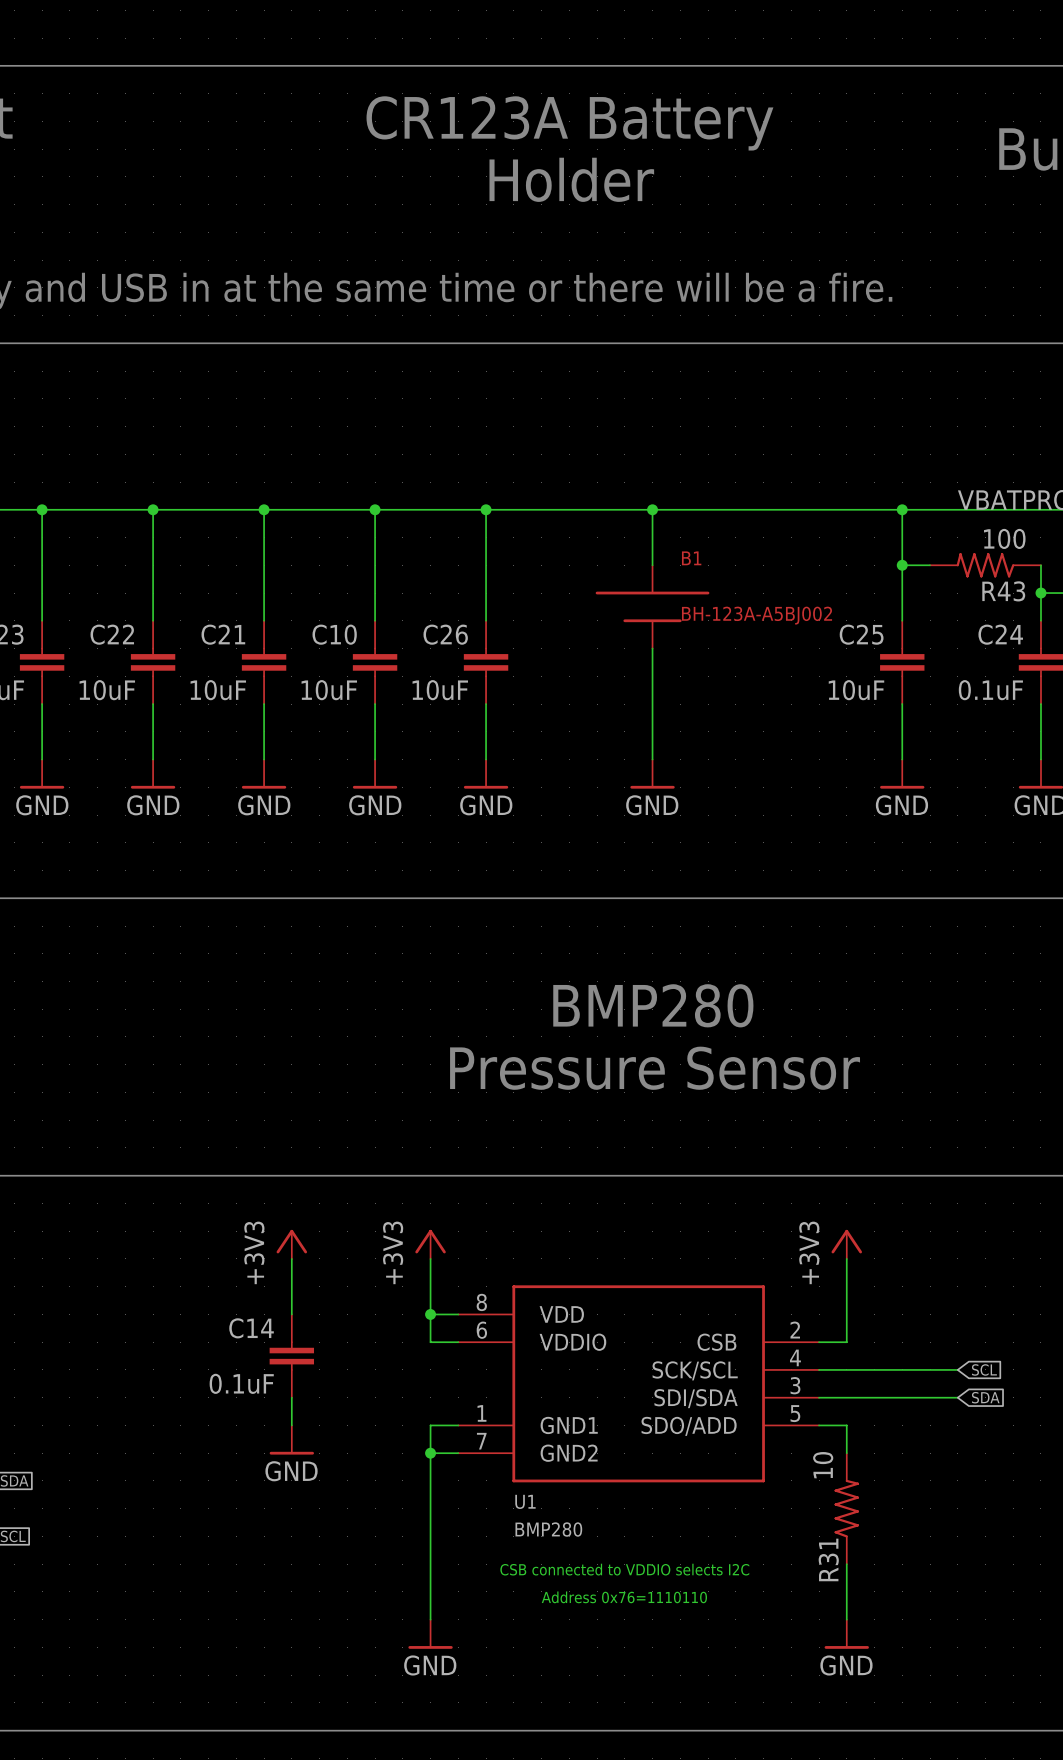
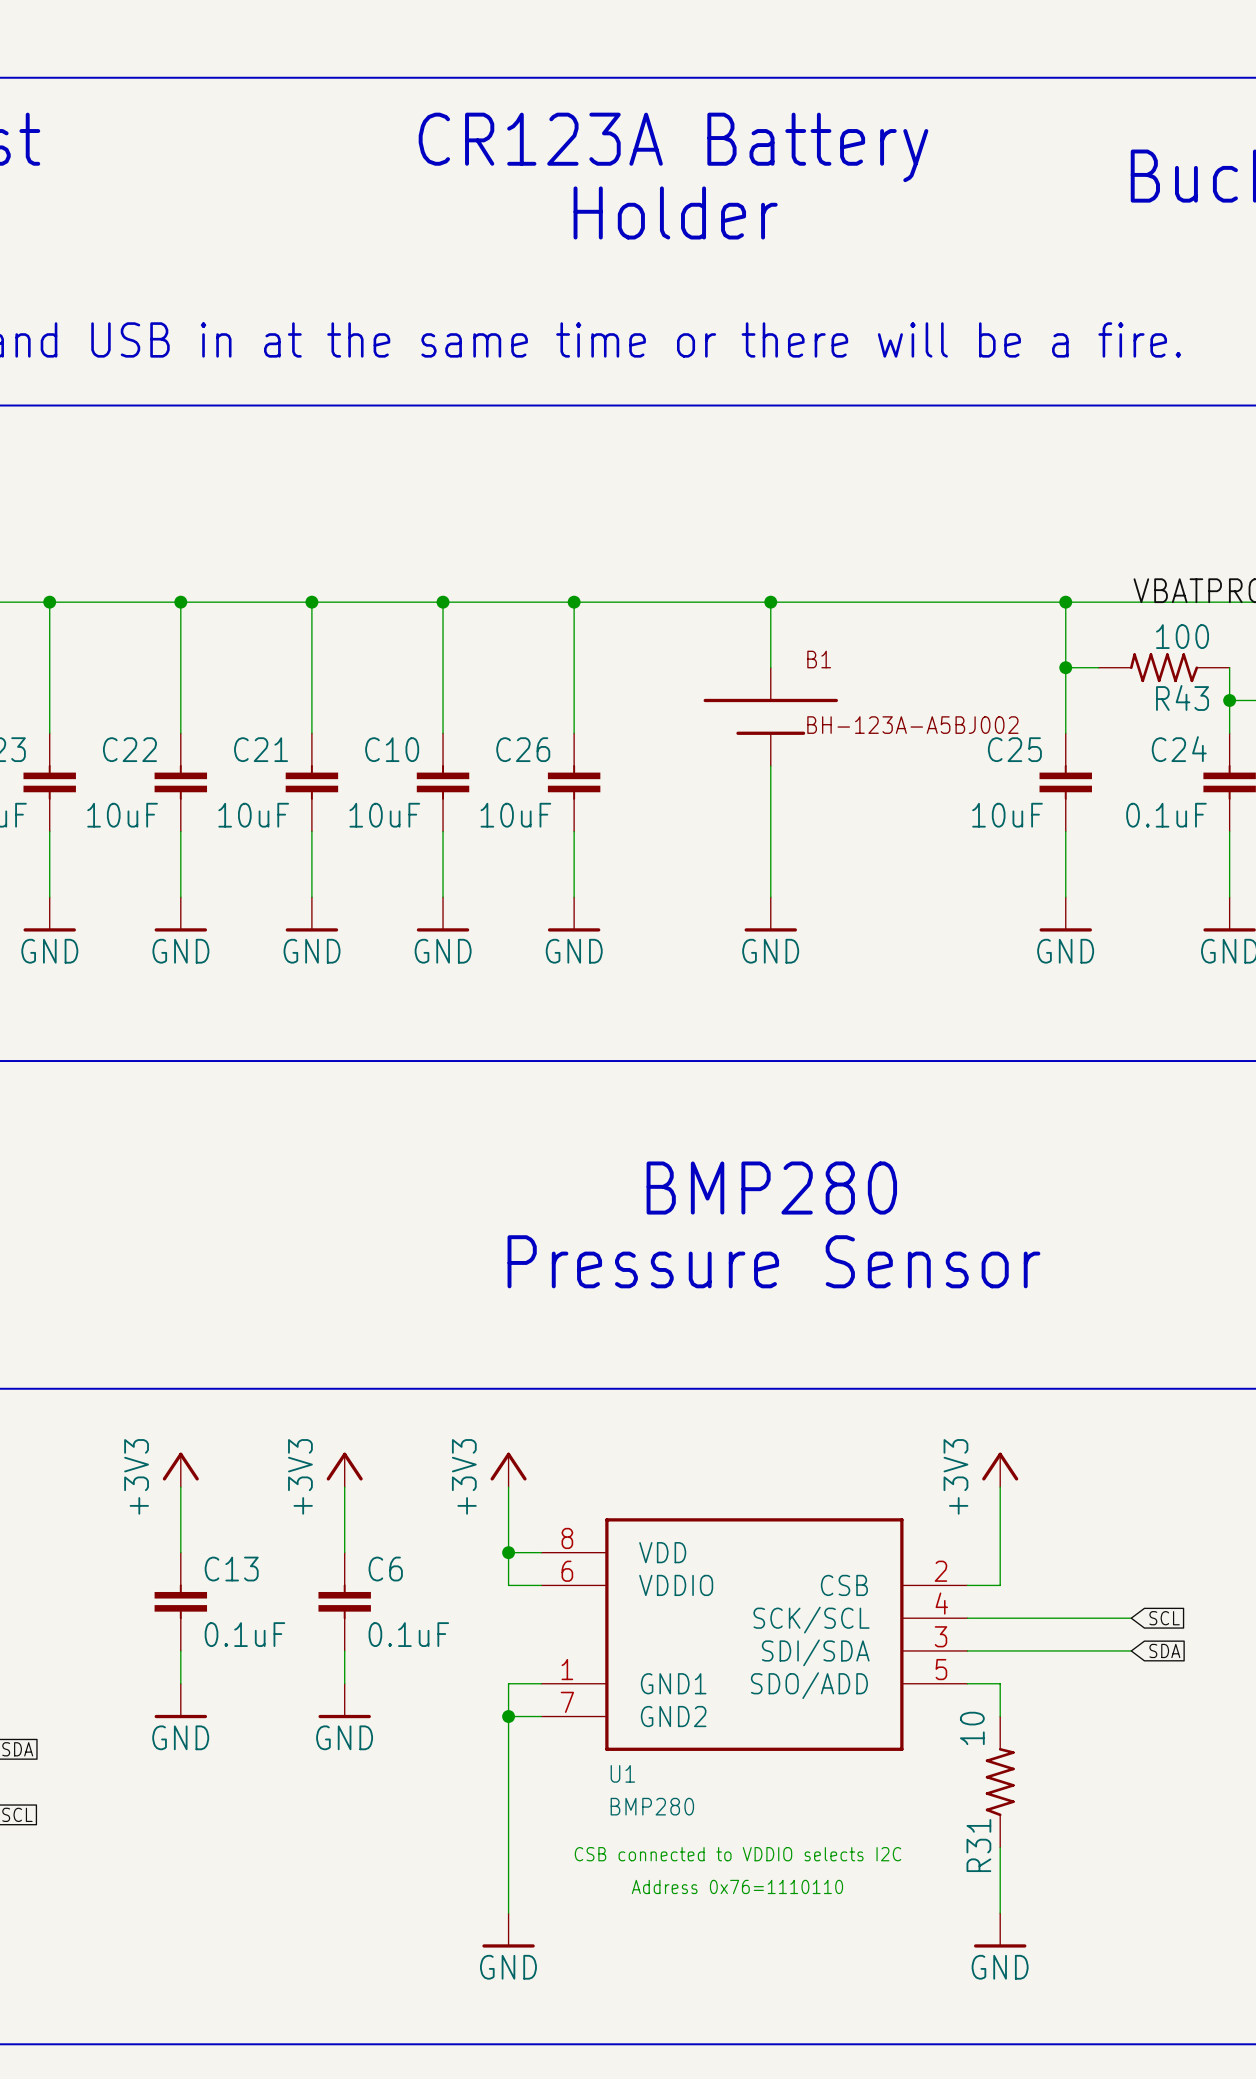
power symbol: none -> +3V3 (180, 1469)
wire: none -> (180, 1487) (180, 1552)
C14 name: C14 (251, 1328) -> C6 (385, 1569)
C13: none -> 0.1uF (180, 1601)
C14 value position: 0.1uF (241, 1383) -> 0.1uF (408, 1634)
wire: none -> (180, 1650) (180, 1683)
power symbol: none -> GND (180, 1700)

